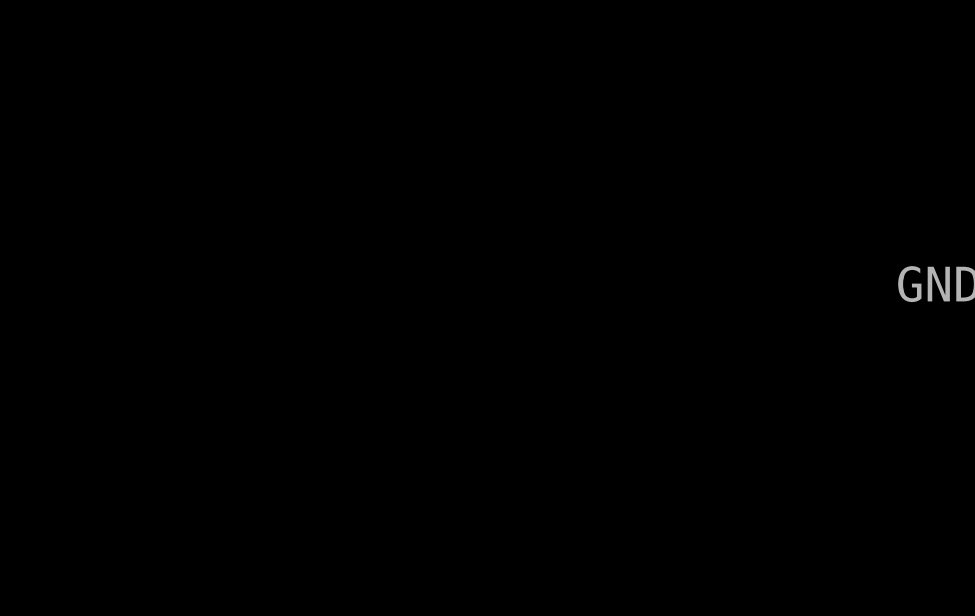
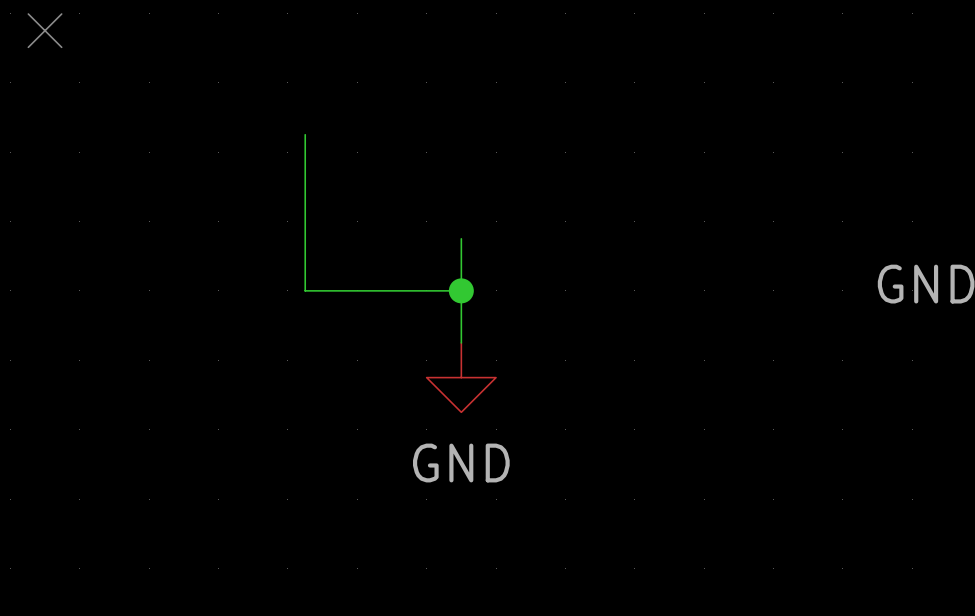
no-connect mark: none -> (45, 30)
wire: none -> (305, 134) (305, 290) (461, 290)
wire: none -> (461, 238) (461, 342)
junction: none -> (461, 290)
power symbol: none -> GND (461, 377)

